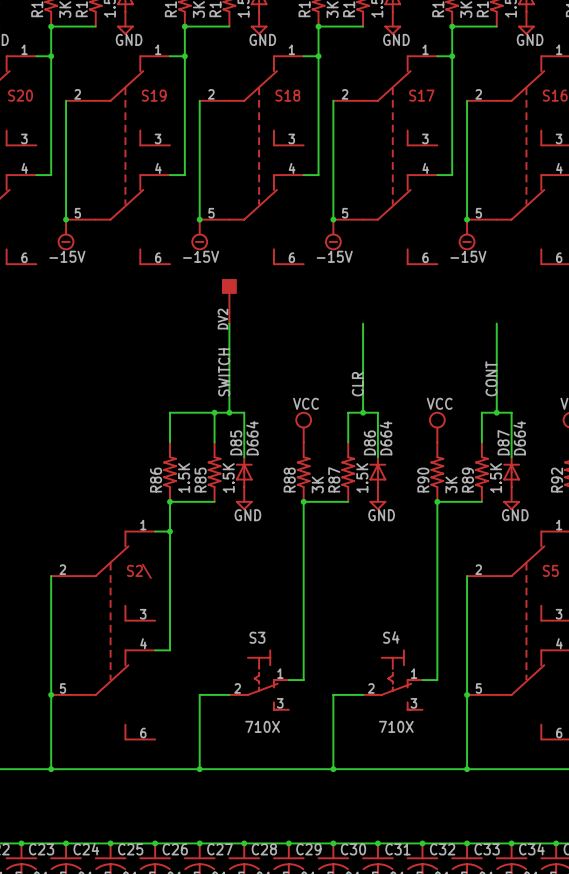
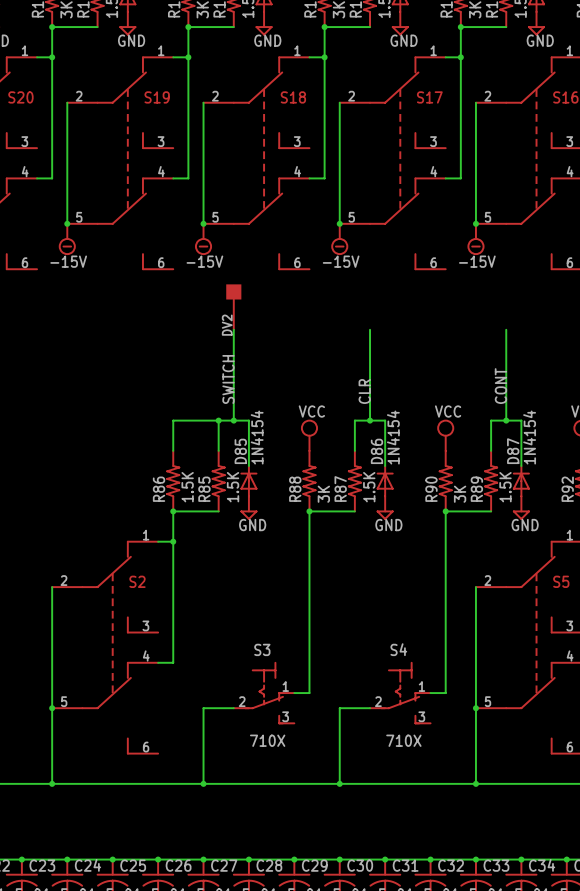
D85 value: D664 (252, 438) -> 1N4154 (257, 437)
D86 value: D664 (386, 438) -> 1N4154 (393, 437)
D87 value: D664 (519, 438) -> 1N4154 (529, 437)
S2\ name: S2\ (139, 571) -> S2 (137, 581)

